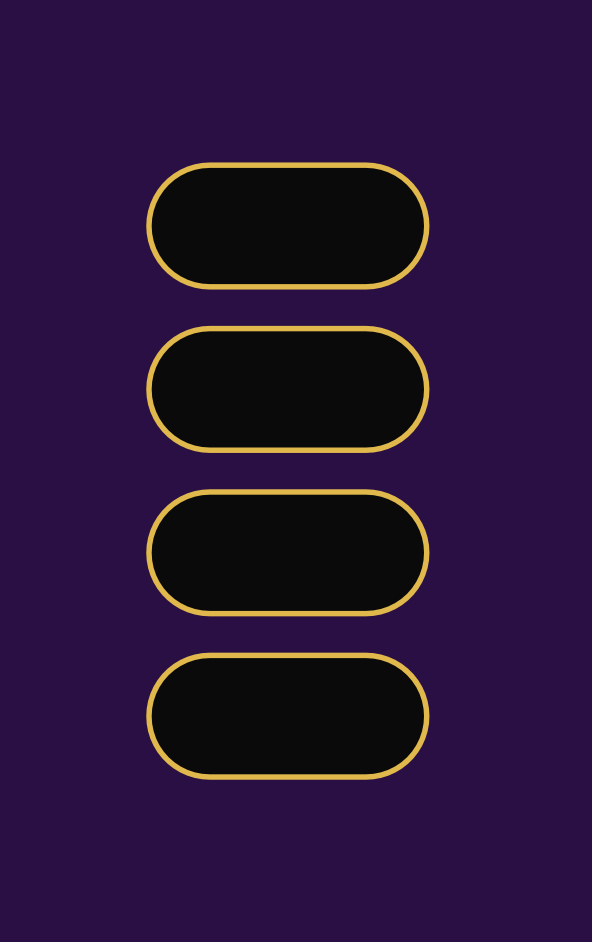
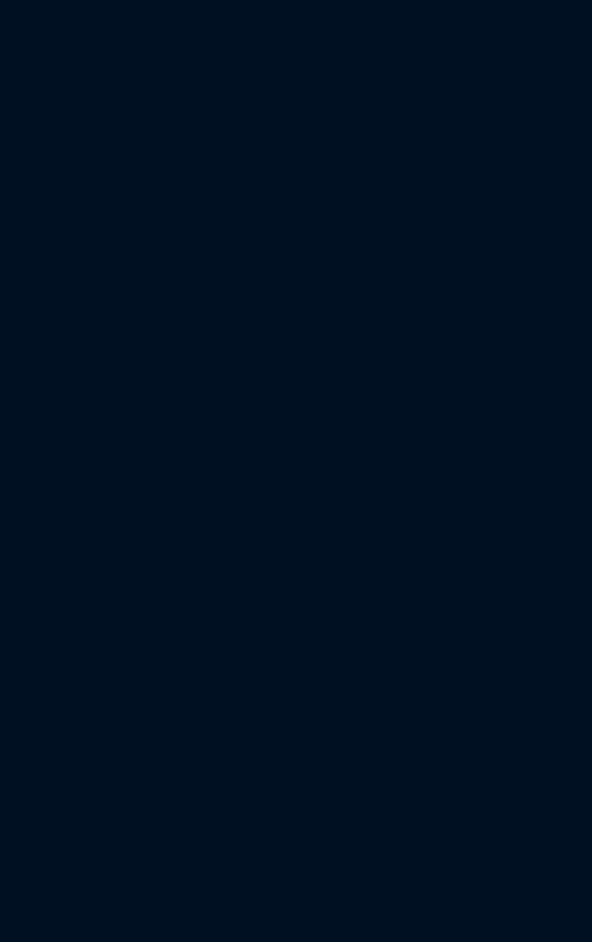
part: (287, 226) -> none
part: (287, 389) -> none
part: (287, 552) -> none
part: (287, 716) -> none

